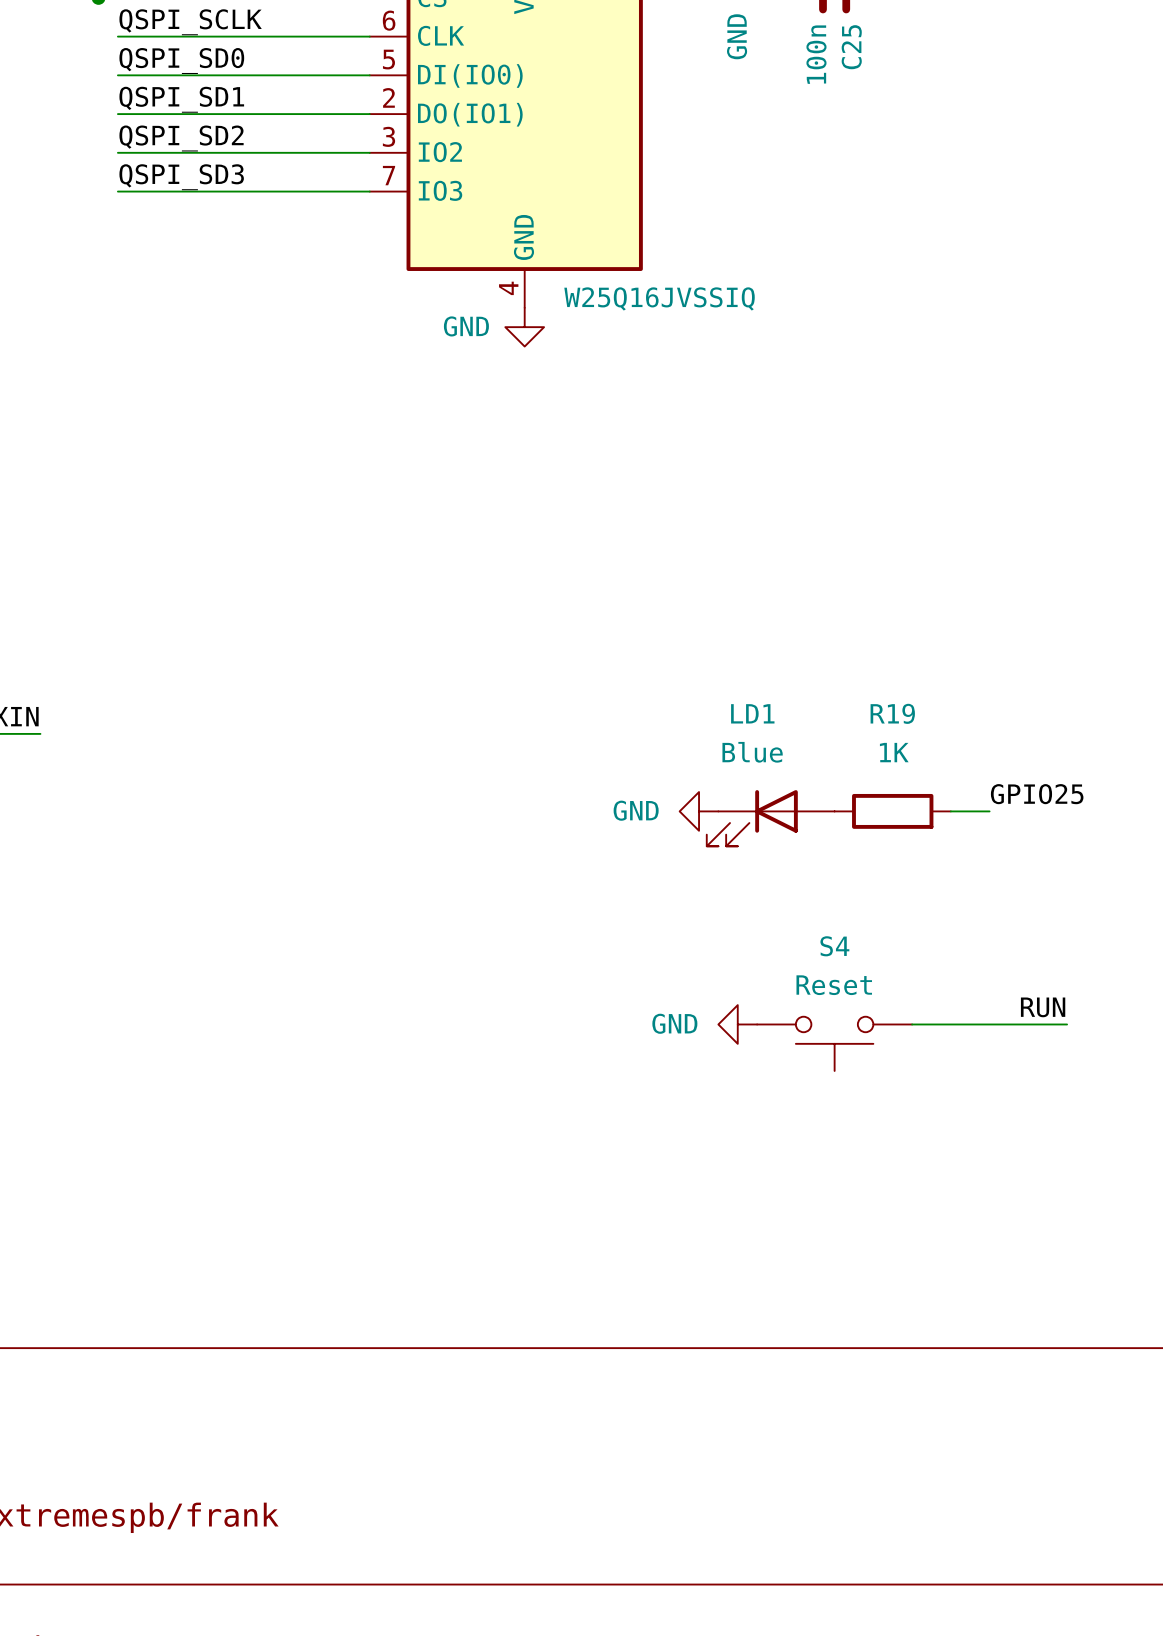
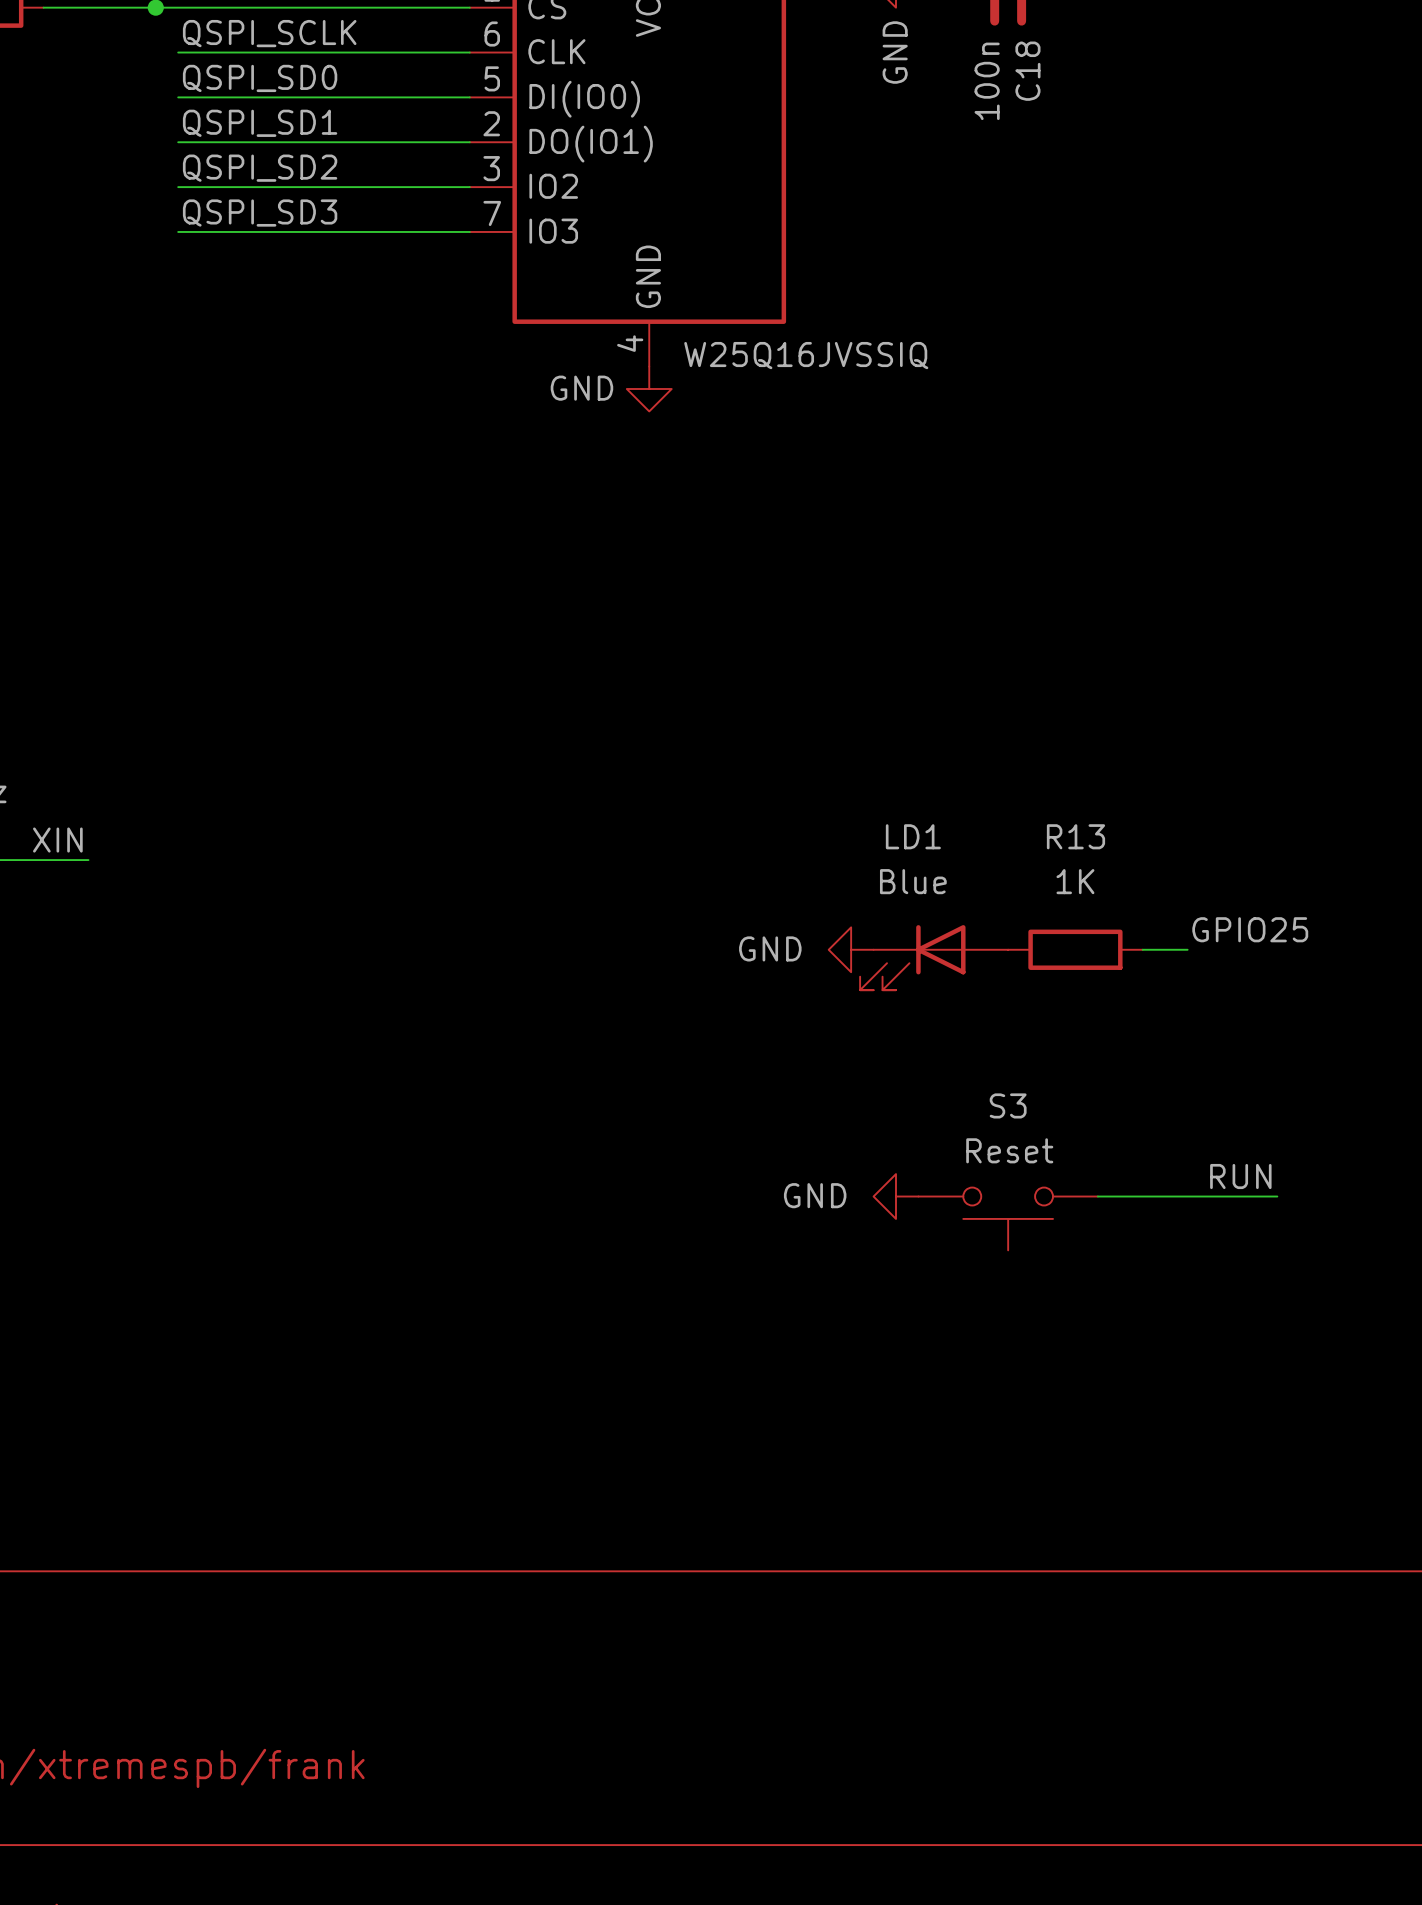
C25 name: C25 (851, 47) -> C18 (1027, 71)
R19 name: R19 (892, 713) -> R13 (1075, 836)
S4 name: S4 (834, 946) -> S3 (1008, 1105)

